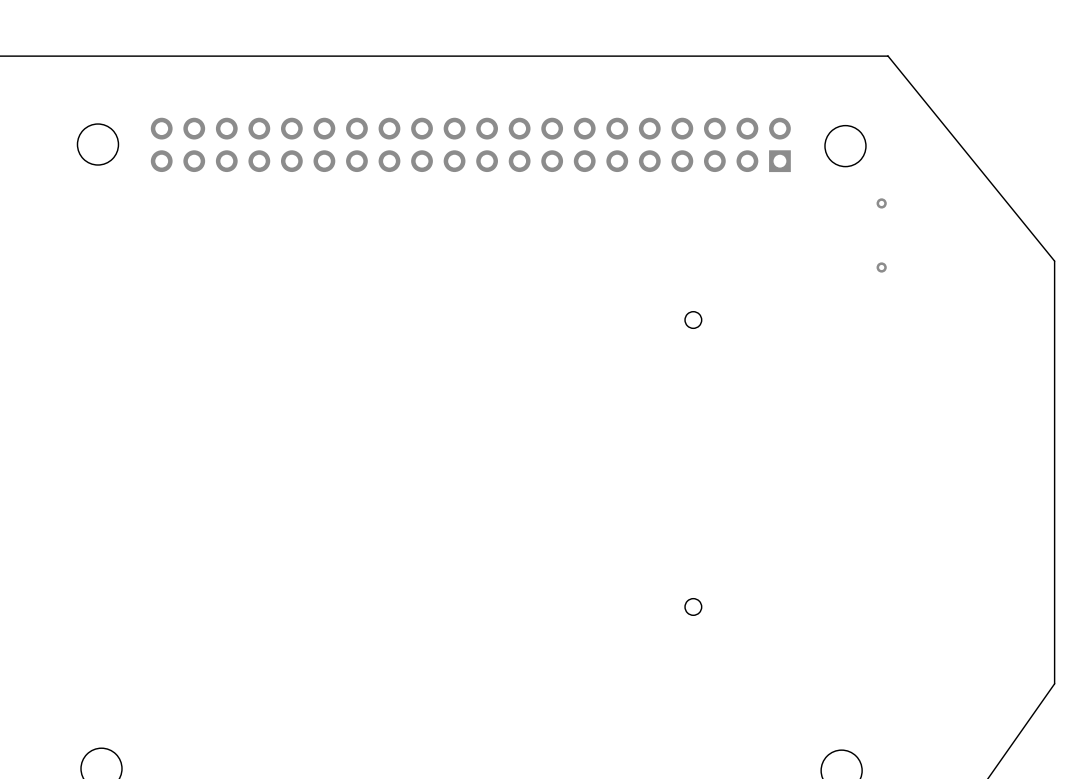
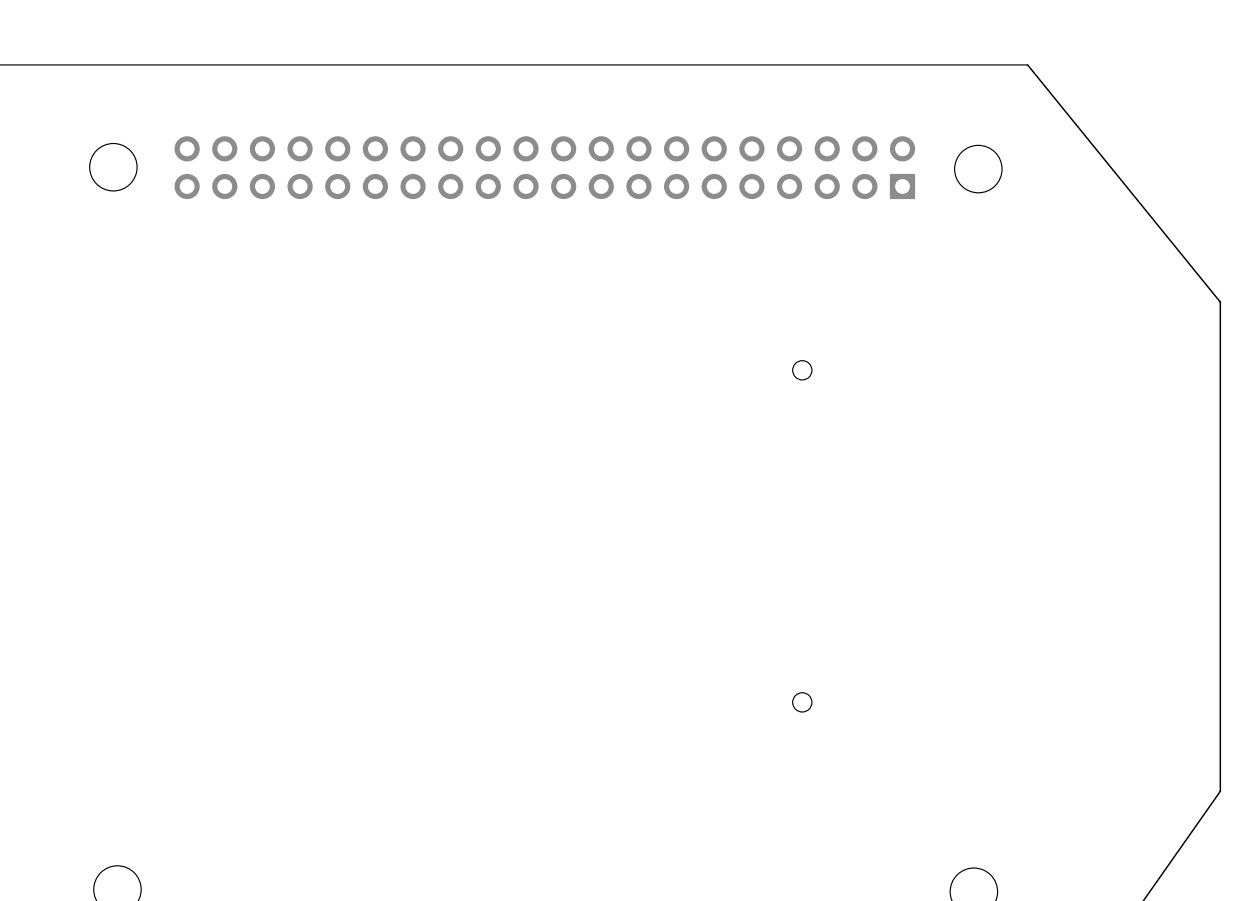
via: (881, 203) -> none
via: (881, 267) -> none

